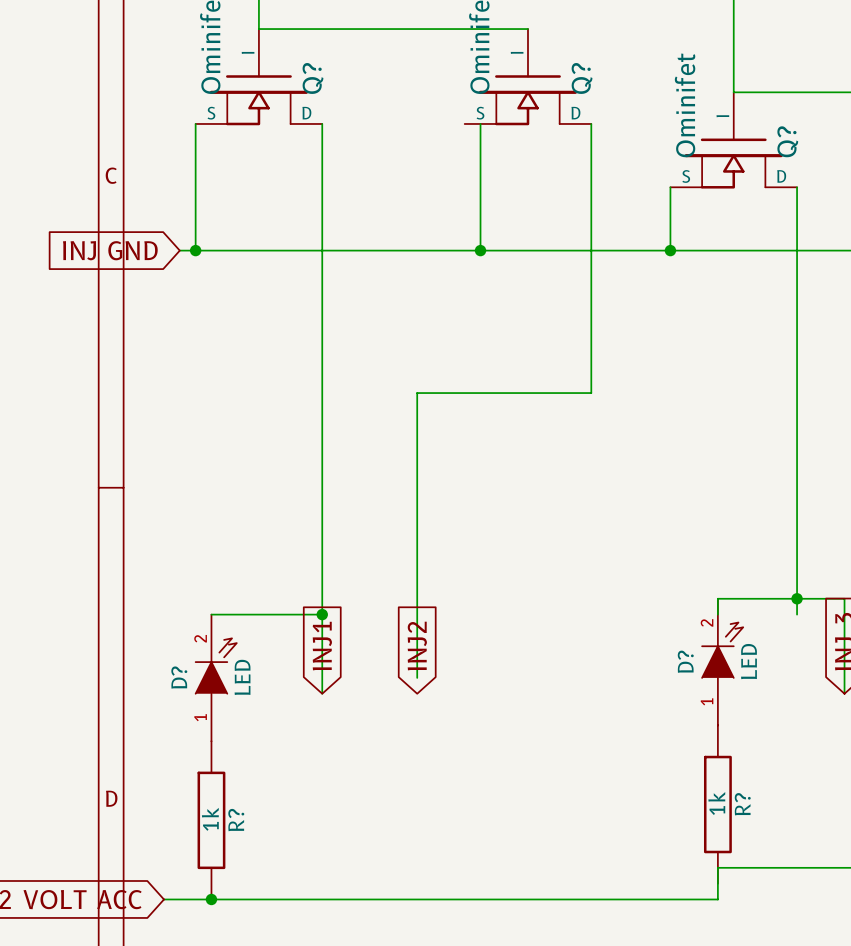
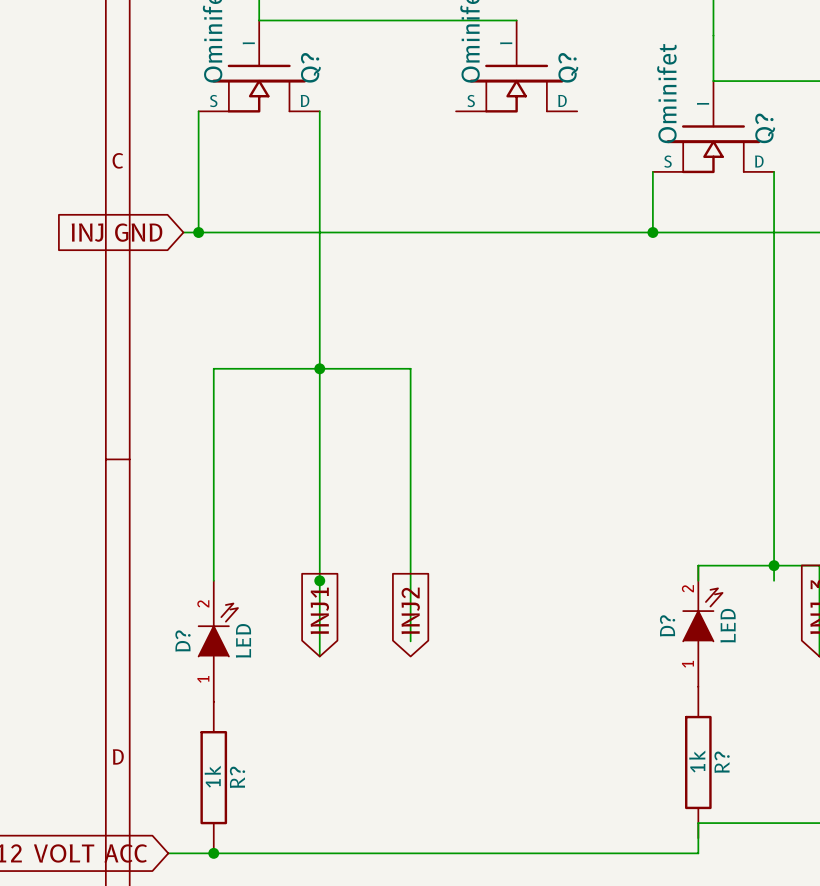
wire: (480, 123) (480, 250) -> none
wire: (591, 123) (591, 393) (417, 393) -> none
junction: (480, 250) -> none
junction: none -> (319, 368)
wire: (211, 614) (322, 614) -> (213, 580) (213, 368) (410, 368)

